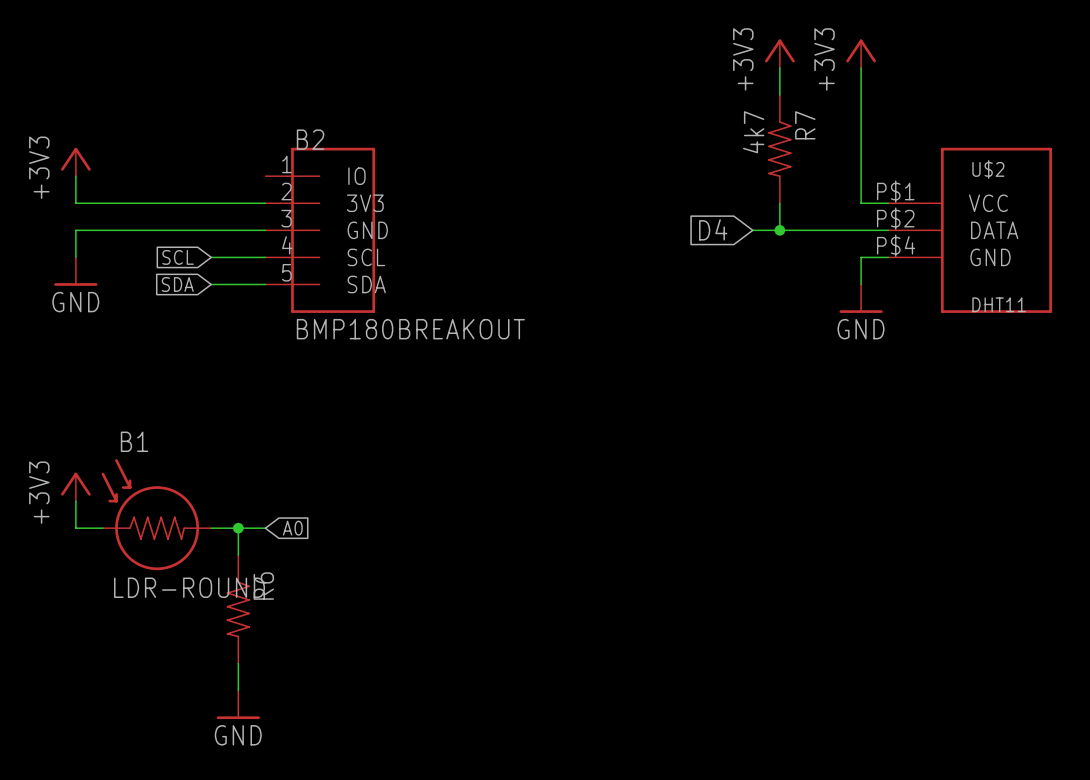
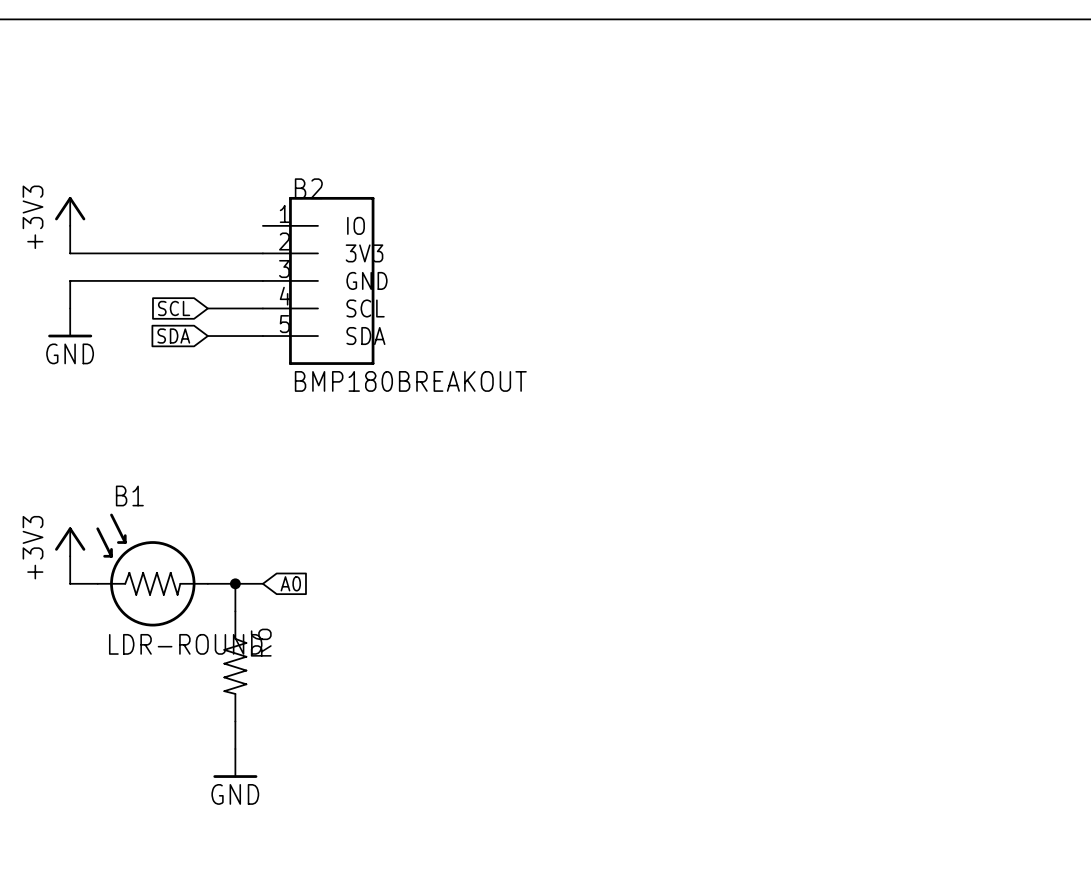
power symbol: +3V3 (779, 53) -> none
power symbol: +3V3 (861, 53) -> none
wire: (779, 67) (779, 94) -> none
wire: (861, 67) (861, 203) (888, 203) -> none
R7: 4k7 (779, 149) -> none
wire: (779, 203) (779, 230) -> none
global label: D4 (713, 229) -> none
wire: (752, 230) (888, 230) -> none
junction: (779, 230) -> none
U$2: DHT11 (970, 230) -> none
wire: (888, 257) (861, 257) (861, 284) -> none
power symbol: GND (861, 298) -> none

